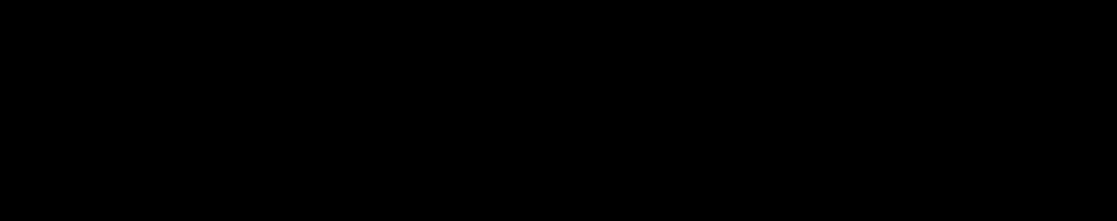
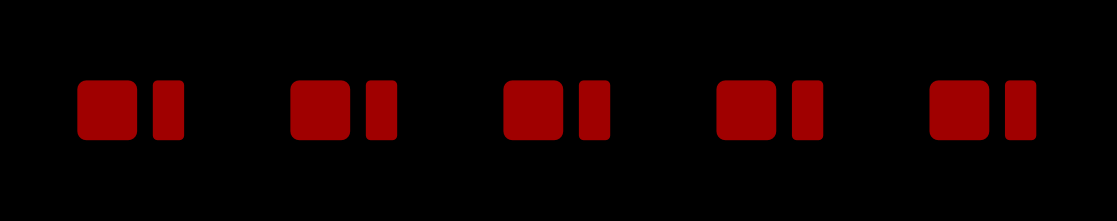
part: none -> (130, 110)
part: none -> (343, 110)
part: none -> (556, 110)
part: none -> (769, 110)
part: none -> (982, 110)

